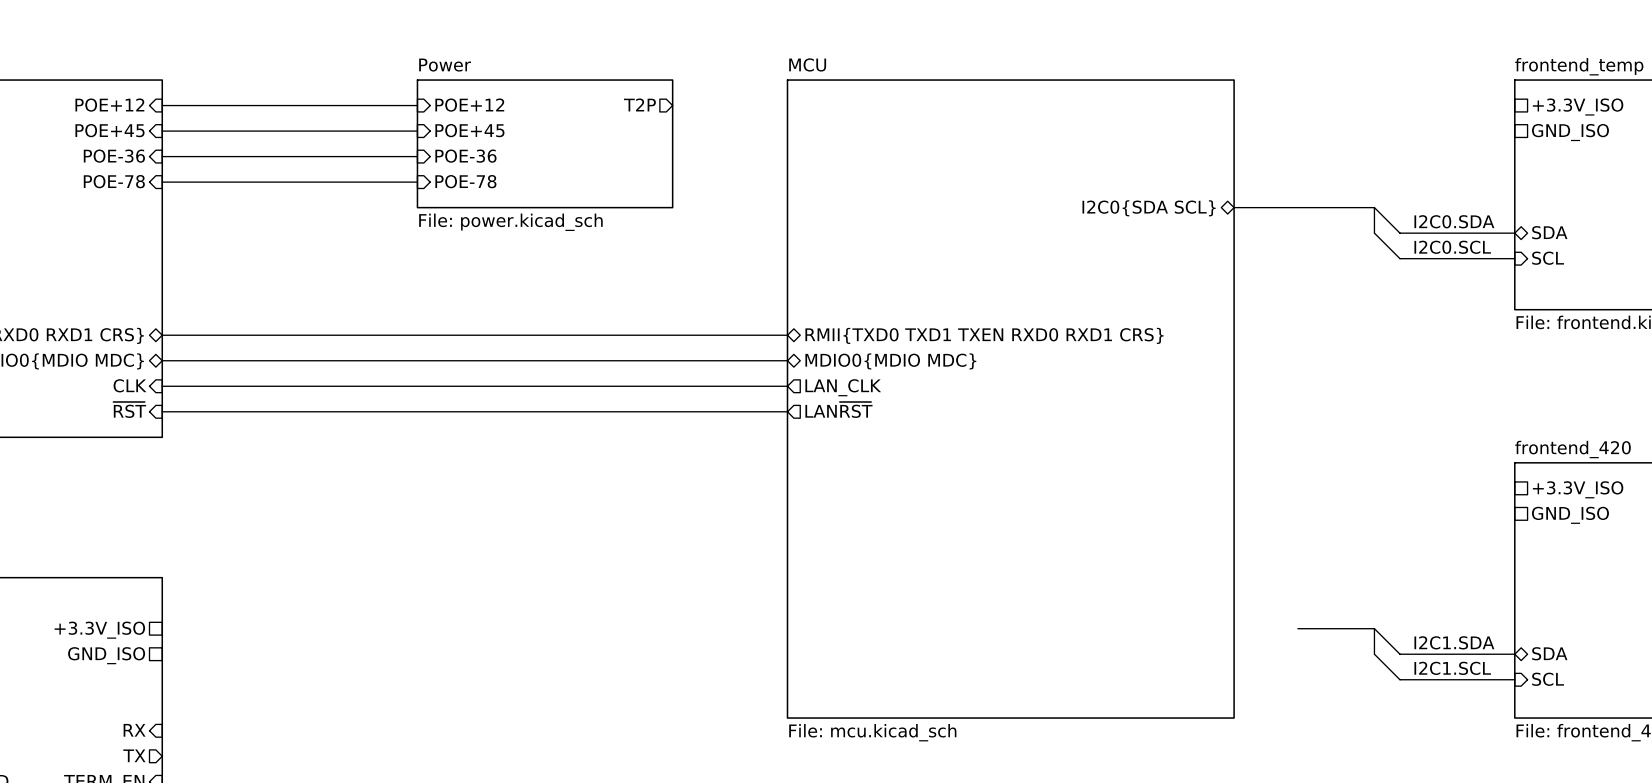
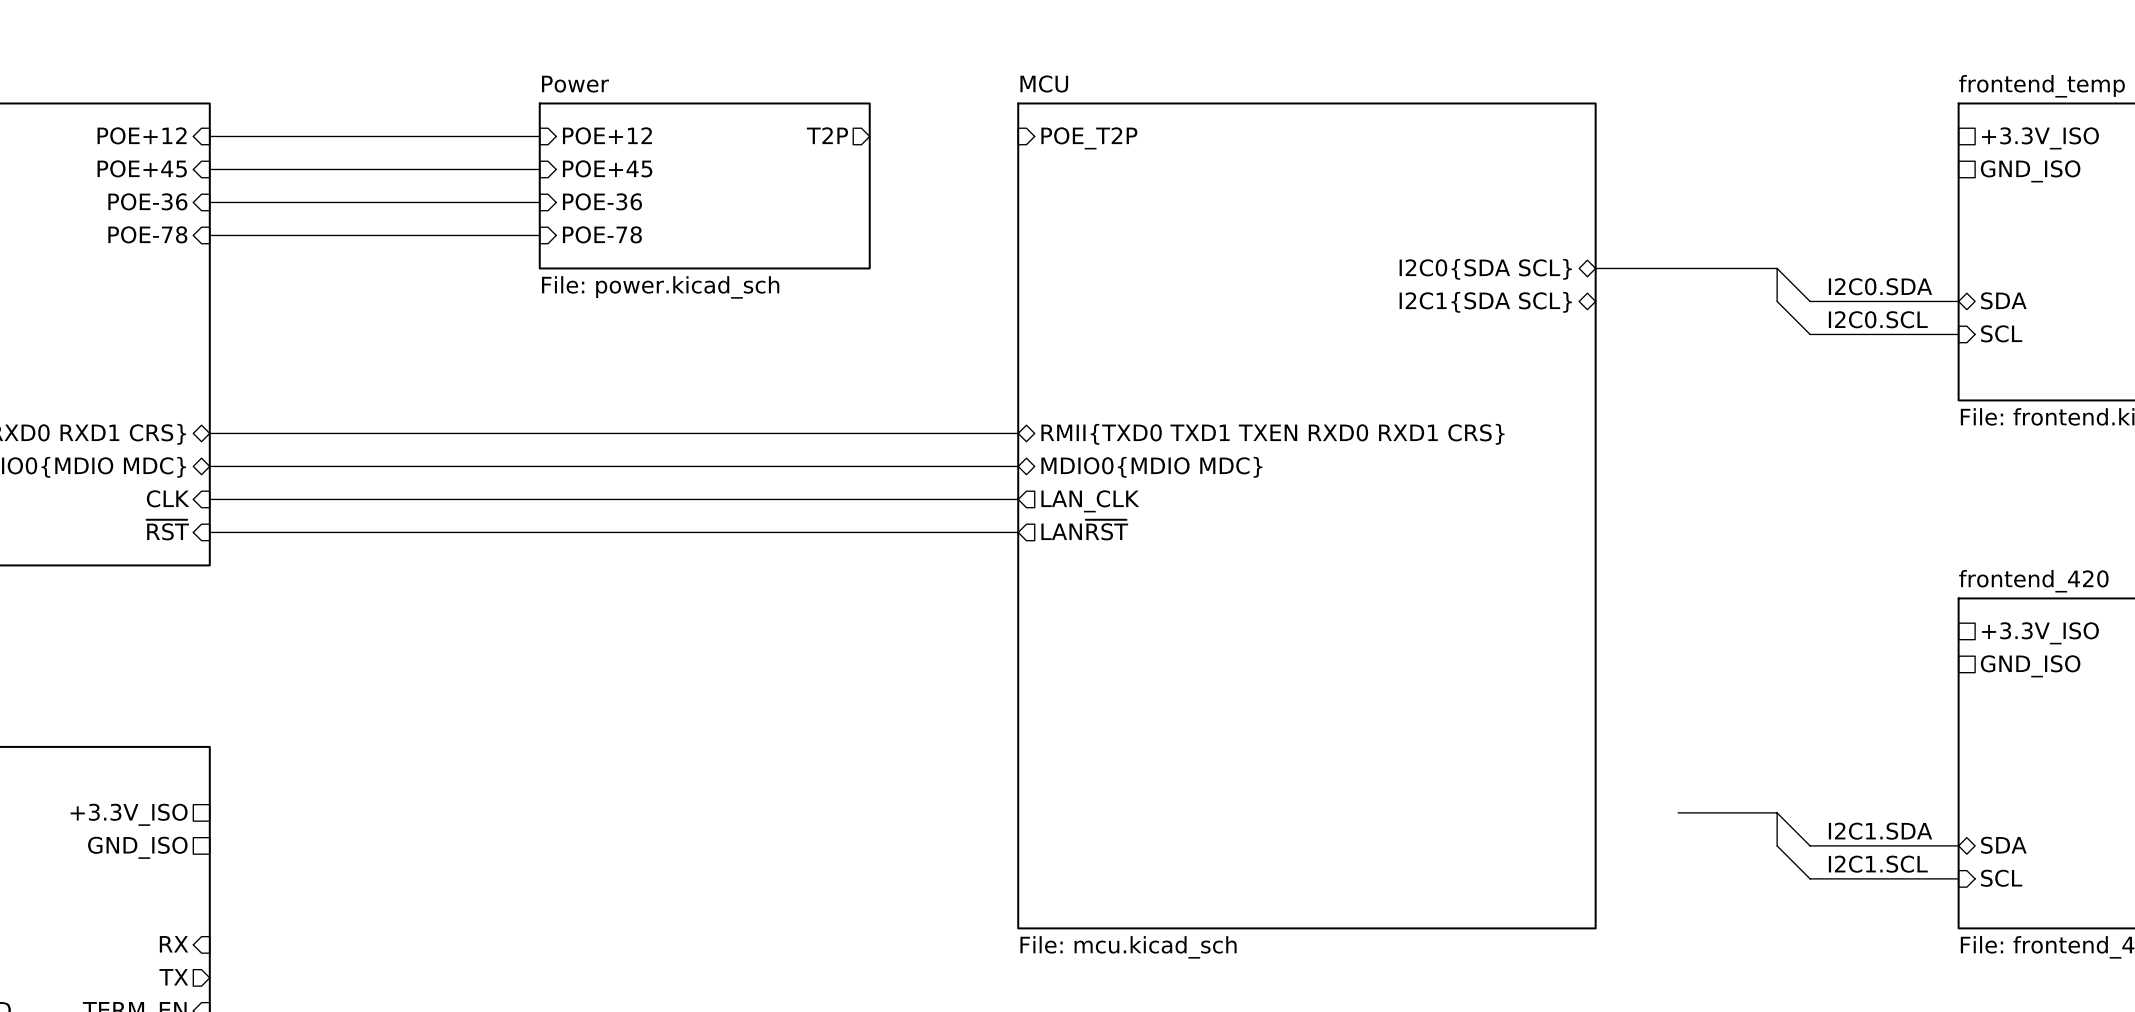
sheet pin: none -> POE_T2P (1089, 138)
sheet pin: none -> I2C1{SDA SCL} (1485, 302)

